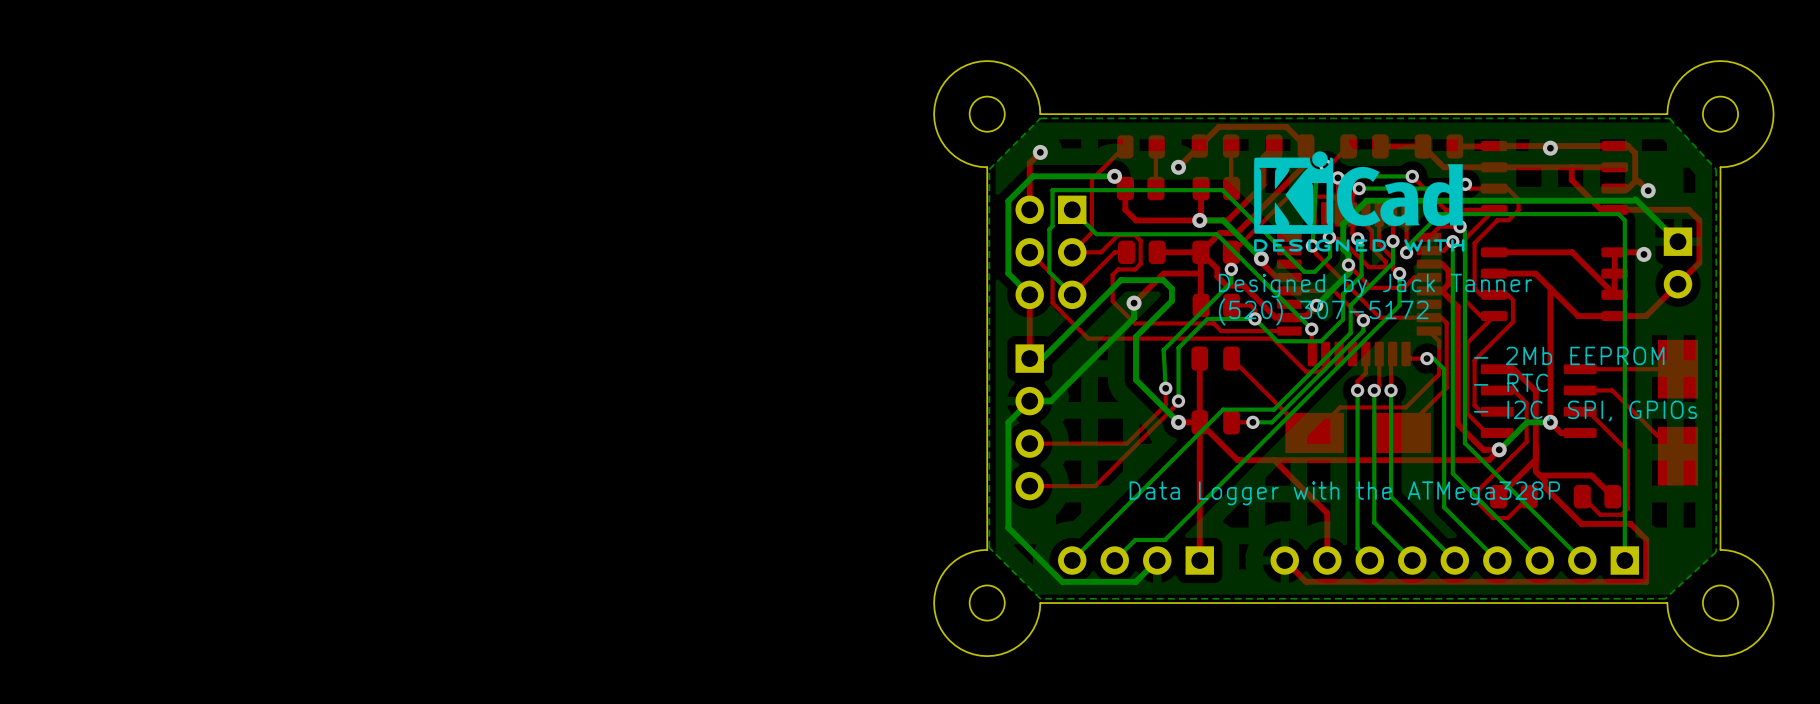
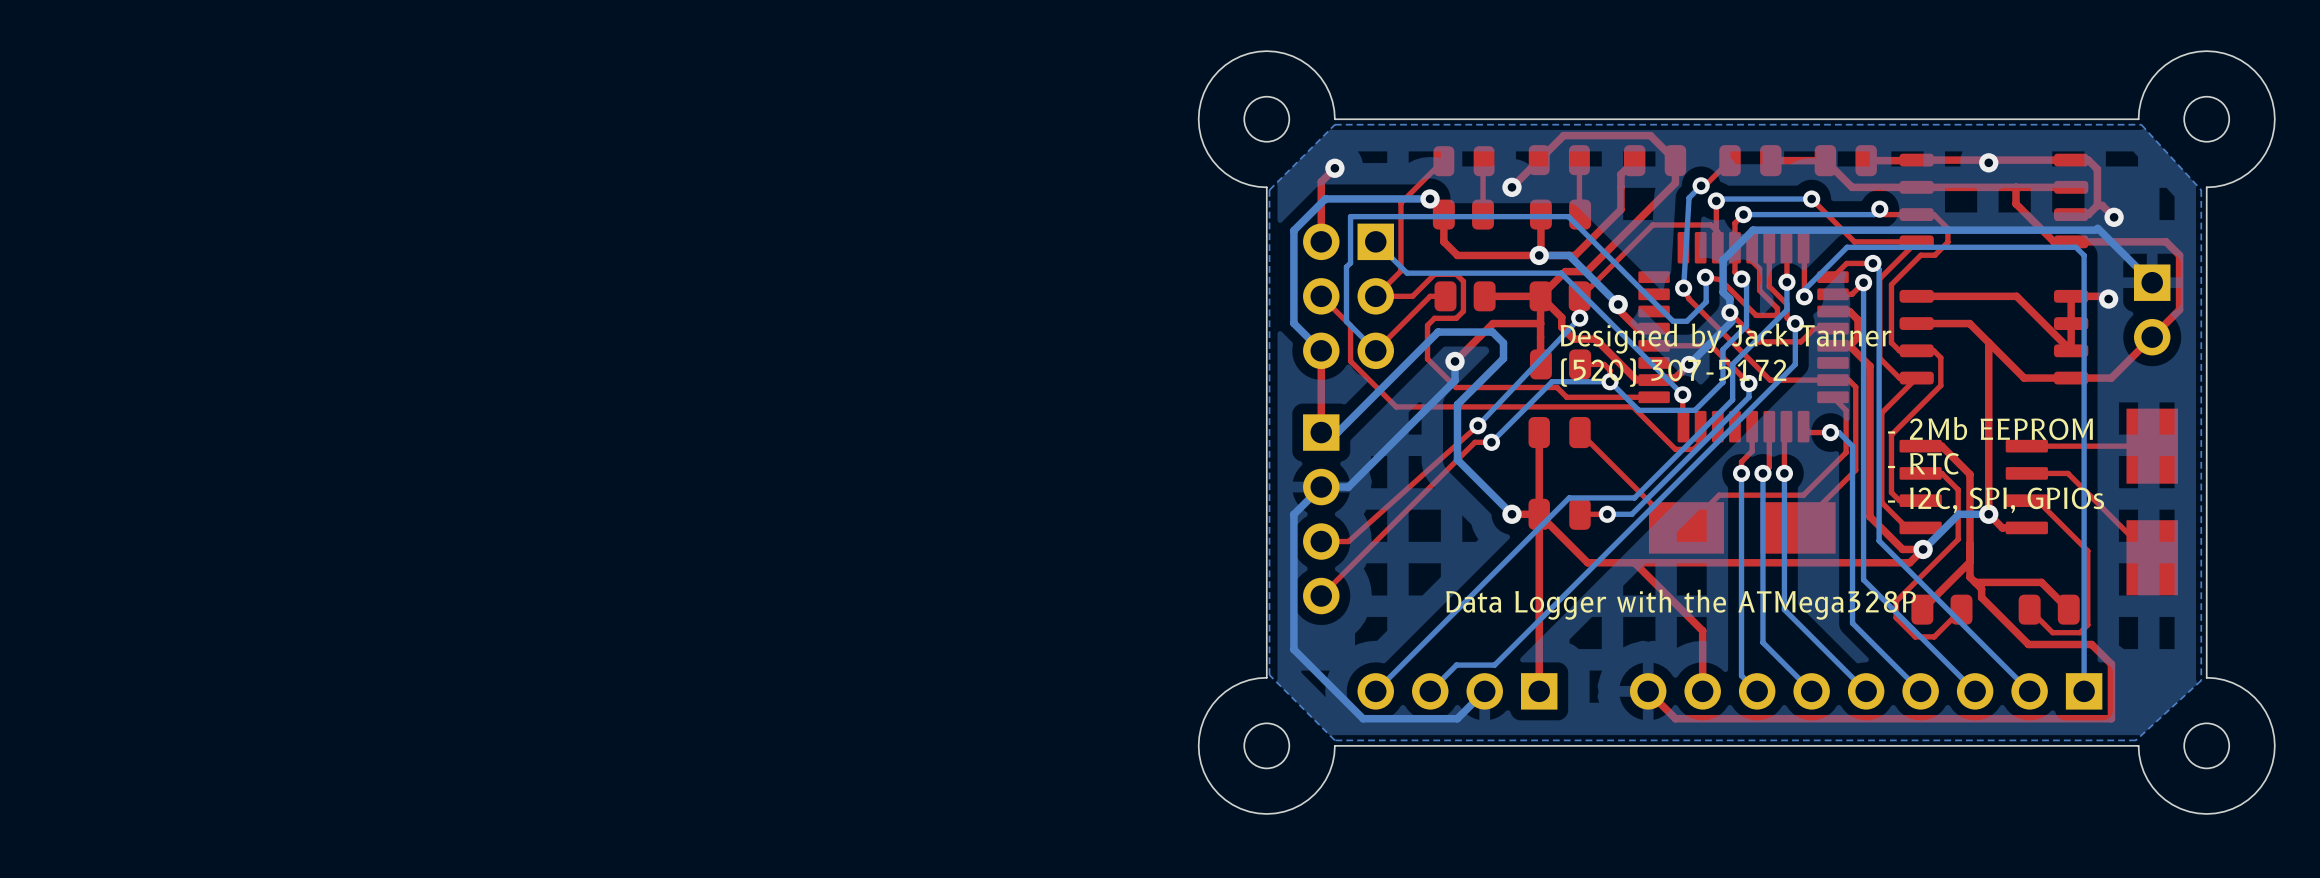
drawing: [1254, 151, 1465, 252] -> none
bottom track: (1231, 269) (1231, 282) (1163, 350) (1165, 388) -> (1579, 318) (1477, 425)
bottom track: (1209, 318) (1207, 318) (1178, 347) (1178, 401) -> (1552, 381) (1491, 442)
via: none -> (1477, 425)
via: none -> (1491, 442)
top track: (1165, 388) (1165, 404) (1127, 443) (1050, 443) -> (1477, 425) (1348, 541)
via: (1165, 388) -> none
top track: (1178, 401) (1095, 486) (1029, 486) -> (1491, 442) (1474, 442) (1321, 596)
via: (1178, 401) -> none

